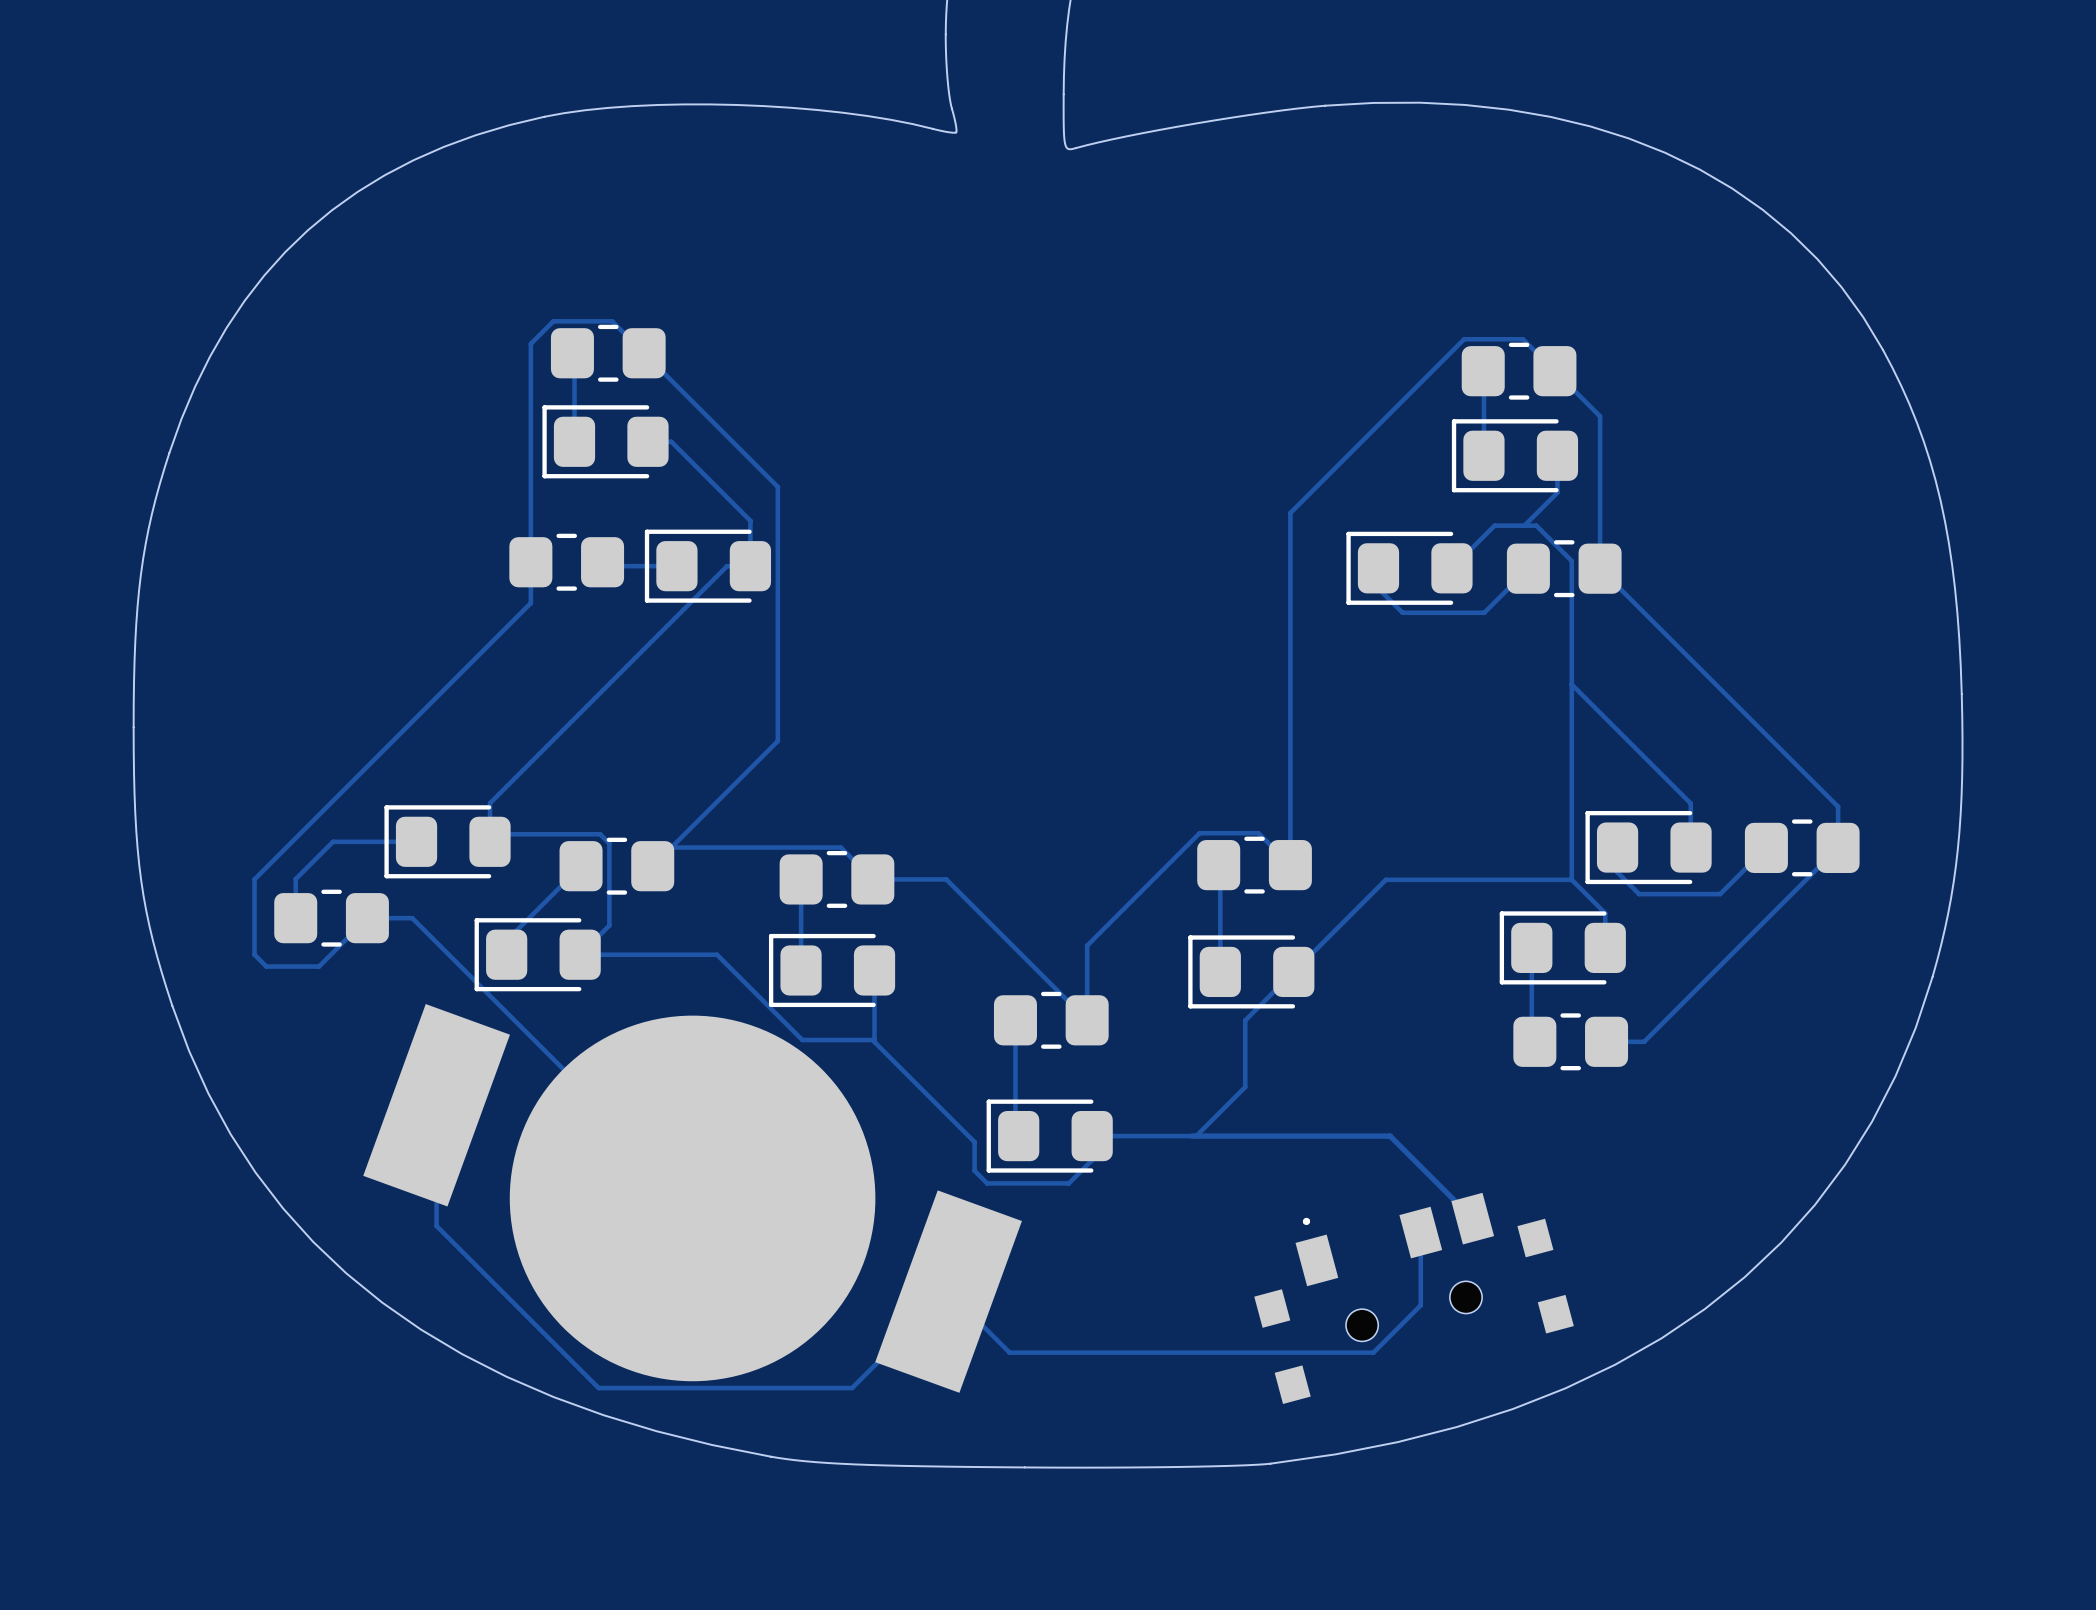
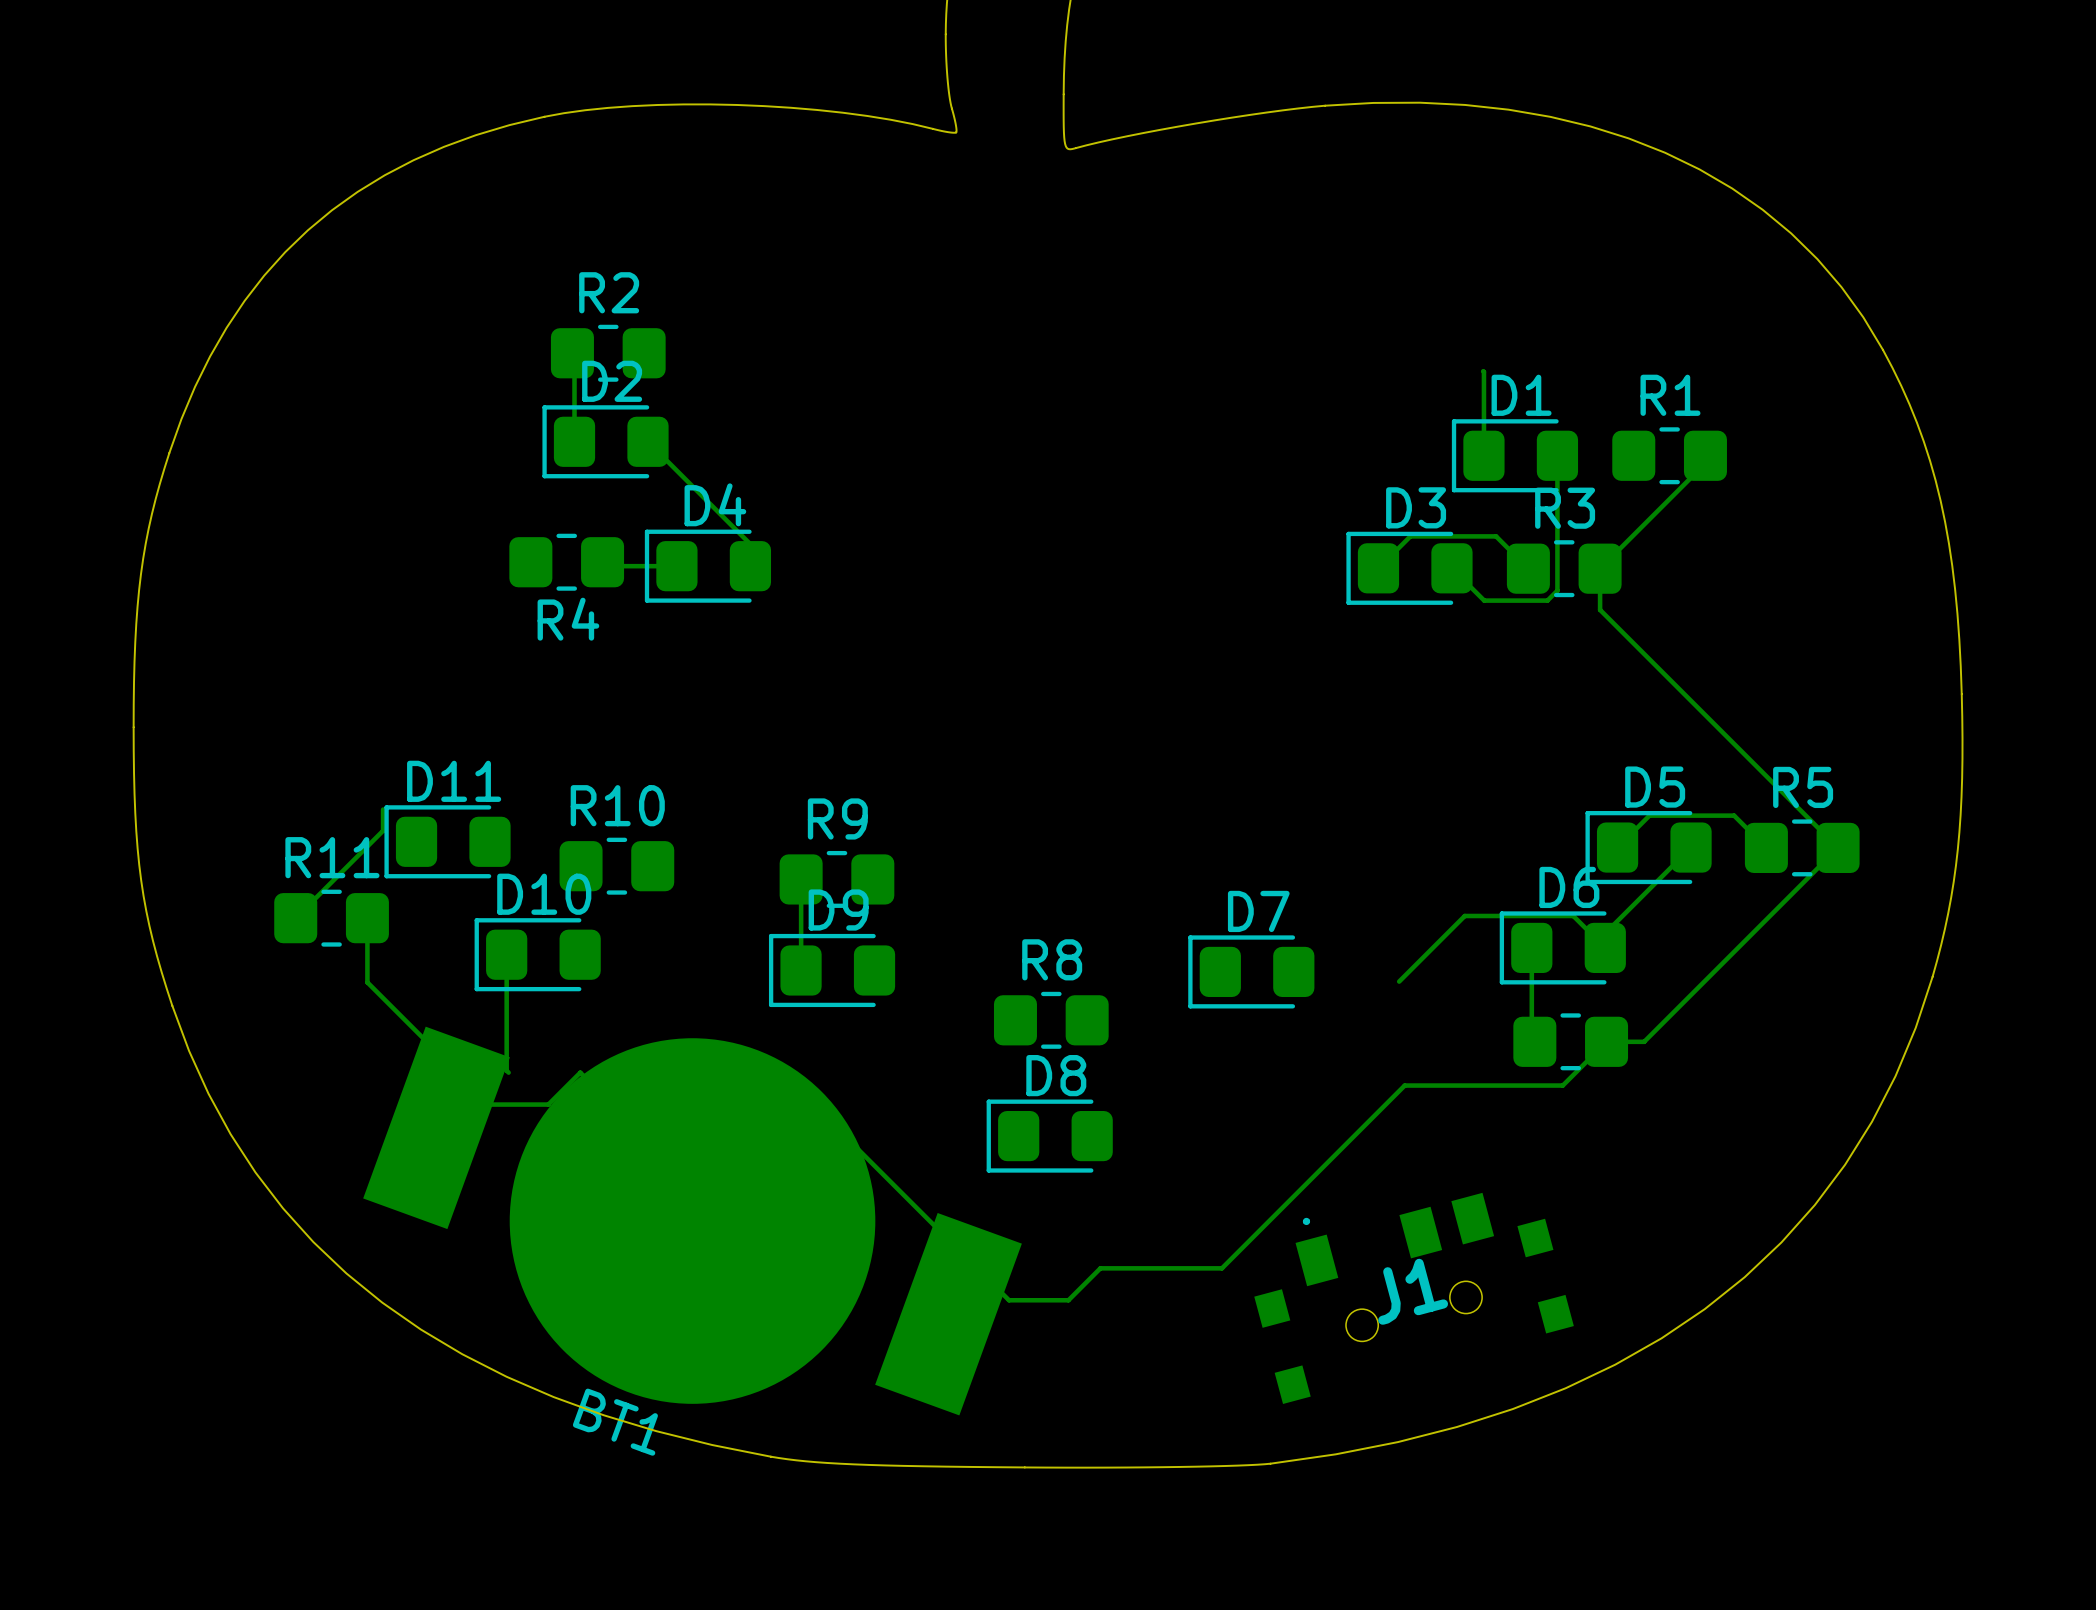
R2 name: none -> R2 (609, 292)
part: (1519, 371) -> none
D2 name: none -> D2 (612, 381)
D1 name: none -> D1 (1521, 395)
track: (647, 441) (671, 441) (750, 521) (750, 544) -> (647, 441) (750, 544)
R1: none -> (1669, 455)
track: (1557, 492) (1524, 525) -> (1557, 492) (1557, 590) (1547, 600) (1484, 600) (1451, 568)
D4 name: none -> D4 (715, 504)
D3 name: none -> D3 (1416, 507)
R3 name: none -> R3 (1565, 508)
track: (750, 566) (727, 566) (490, 803) (490, 841) (497, 834) (600, 834) (609, 843) (609, 925) (580, 954) (717, 954) (802, 1040) (874, 1040) -> none
track: (1378, 568) (1378, 588) (1402, 612) (1484, 612) (1528, 568) -> (1378, 568) (1410, 536) (1496, 536) (1528, 568)
track: (1451, 568) (1494, 525) (1536, 525) (1571, 561) (1571, 879) -> none
R4 name: none -> R4 (568, 619)
track: (1571, 684) (1690, 803) (1690, 847) -> none
D11 name: none -> D11 (454, 781)
D5 name: none -> D5 (1655, 787)
R5 name: none -> R5 (1803, 787)
R10 name: none -> R10 (617, 805)
R9 name: none -> R9 (837, 818)
track: (416, 841) (333, 841) (295, 879) (295, 918) -> (383, 809) (383, 830) (295, 918)
track: (671, 847) (840, 847) (872, 879) (946, 879) (1087, 1020) (1087, 945) (1199, 833) (1258, 833) (1290, 865) (1290, 513) (1464, 339) (1523, 339) (1600, 416) (1600, 568) (1838, 806) (1838, 847) -> (1705, 455) (1705, 463) (1600, 568) (1600, 609) (1838, 847)
track: (1617, 847) (1617, 872) (1639, 894) (1720, 894) (1766, 847) -> (1617, 847) (1649, 815) (1734, 815) (1766, 847)
R11 name: none -> R11 (332, 857)
track: (1218, 865) (1220, 866) (1220, 971) -> none
part: (1254, 865) -> none
track: (581, 866) (506, 940) (506, 954) -> (508, 1072) (506, 1070) (506, 954)
track: (652, 866) (777, 741) (777, 486) (612, 321) (553, 321) (530, 343) (530, 603) (254, 879) (254, 954) (266, 966) (319, 966) (367, 918) (412, 918) (692, 1198) -> none
track: (1571, 879) (1605, 913) (1605, 933) -> (1691, 847) (1605, 933)
track: (1571, 879) (1385, 879) (1245, 1020) (1245, 1087) (1196, 1136) (1092, 1136) (1092, 1160) (1068, 1183) -> none
D6 name: none -> D6 (1569, 887)
D10 name: none -> D10 (544, 894)
D9 name: none -> D9 (838, 910)
D7 name: none -> D7 (1258, 911)
track: none -> (367, 918) (367, 982) (489, 1104) (548, 1104) (580, 1072) (617, 1109) (754, 1109) (786, 1077) (1009, 1300) (1068, 1300) (1100, 1268) (1221, 1268) (1404, 1085) (1562, 1085) (1606, 1041)
track: none -> (1605, 947) (1573, 915) (1464, 915) (1399, 981)
R8 name: none -> R8 (1052, 959)
track: (874, 970) (874, 1042) (974, 1142) (974, 1170) (987, 1183) (1068, 1183) -> none
track: (1015, 1020) (1015, 1132) (1018, 1136) -> none
D8 name: none -> D8 (1056, 1075)
track: (436, 1105) (436, 1226) (598, 1388) (852, 1388) (948, 1291) (1009, 1352) (1373, 1352) (1420, 1305) (1420, 1232) -> none
track: (1192, 1136) (1390, 1136) (1472, 1218) -> none
BT1 position: (692, 1198) -> (692, 1221)
J1 name: none -> J1 (1413, 1291)
BT1 name: none -> BT1 (615, 1422)

